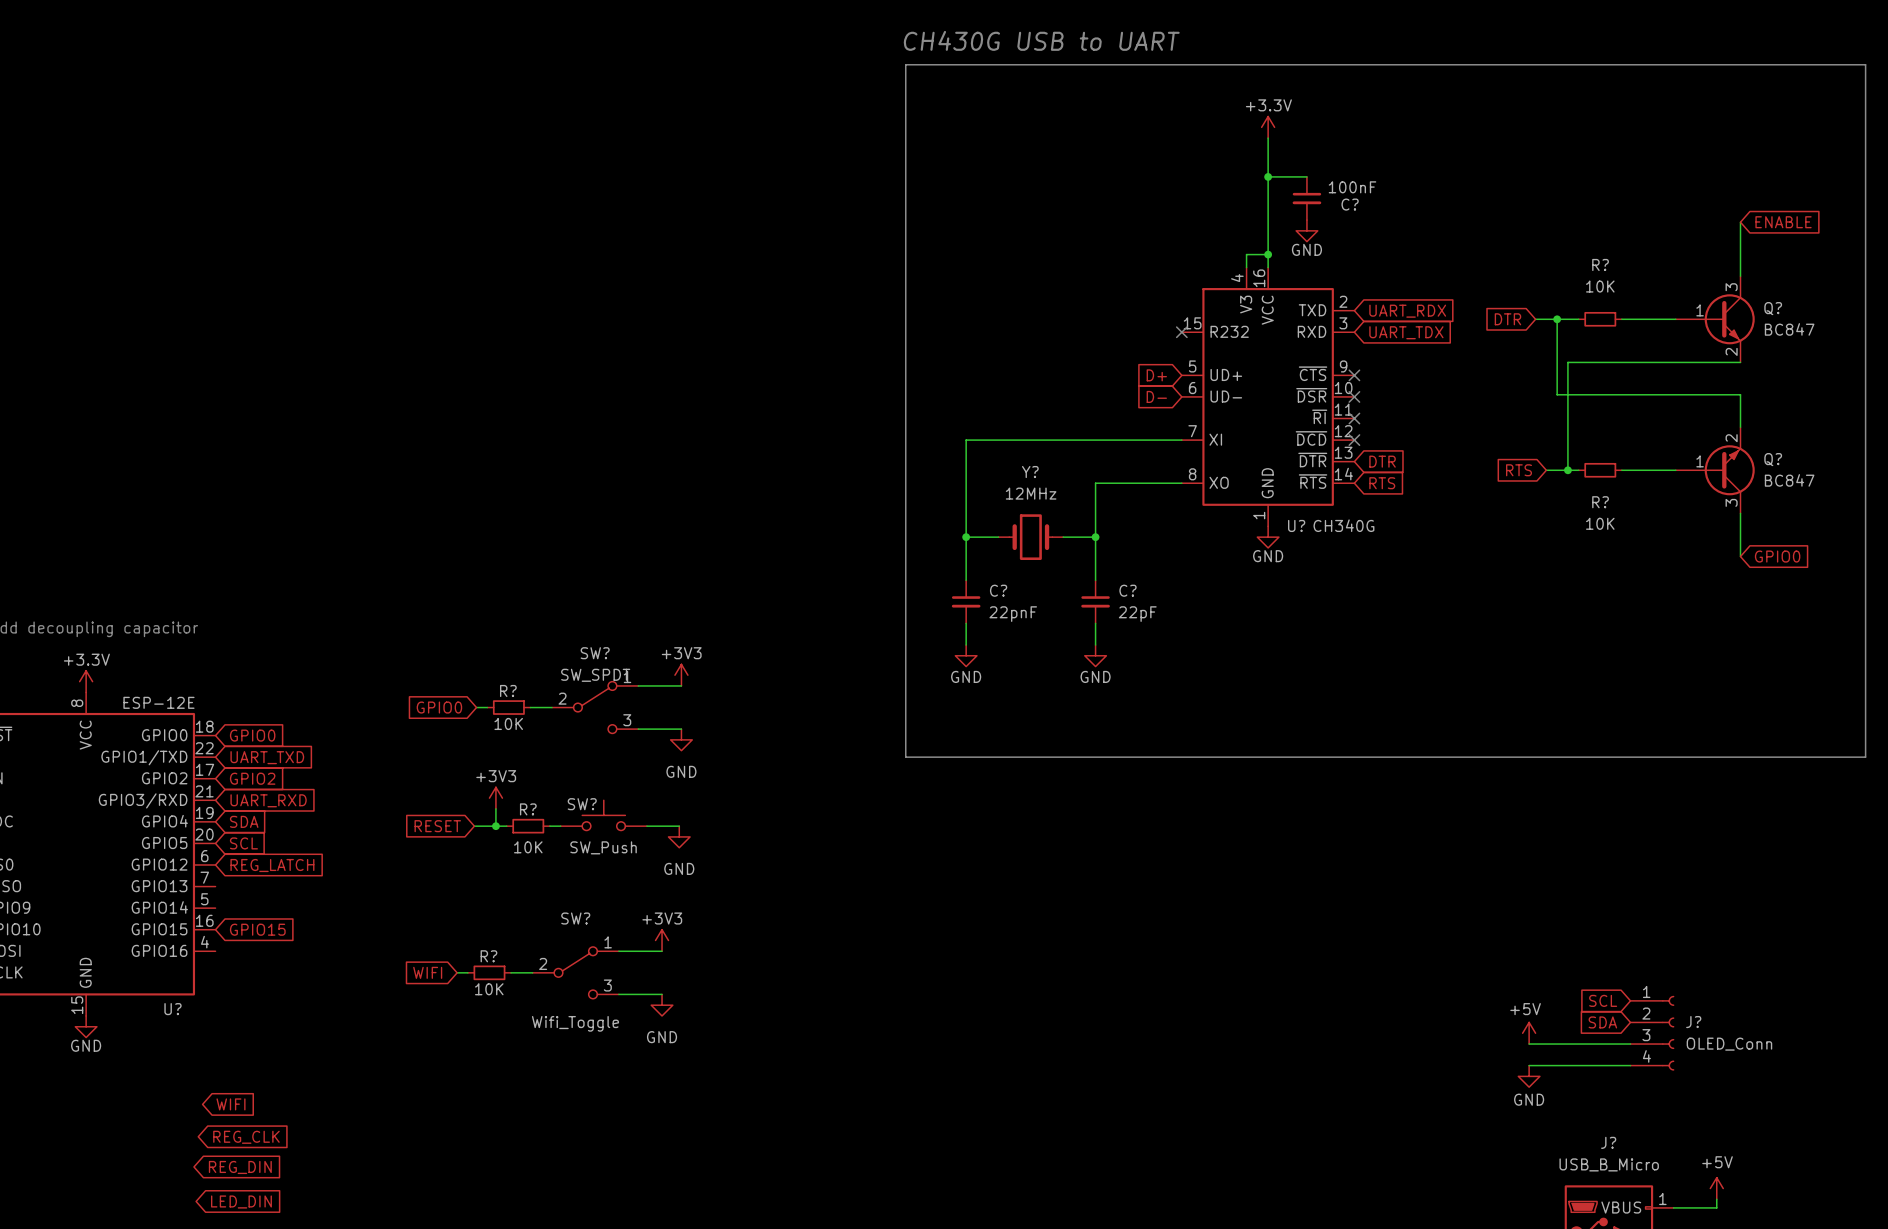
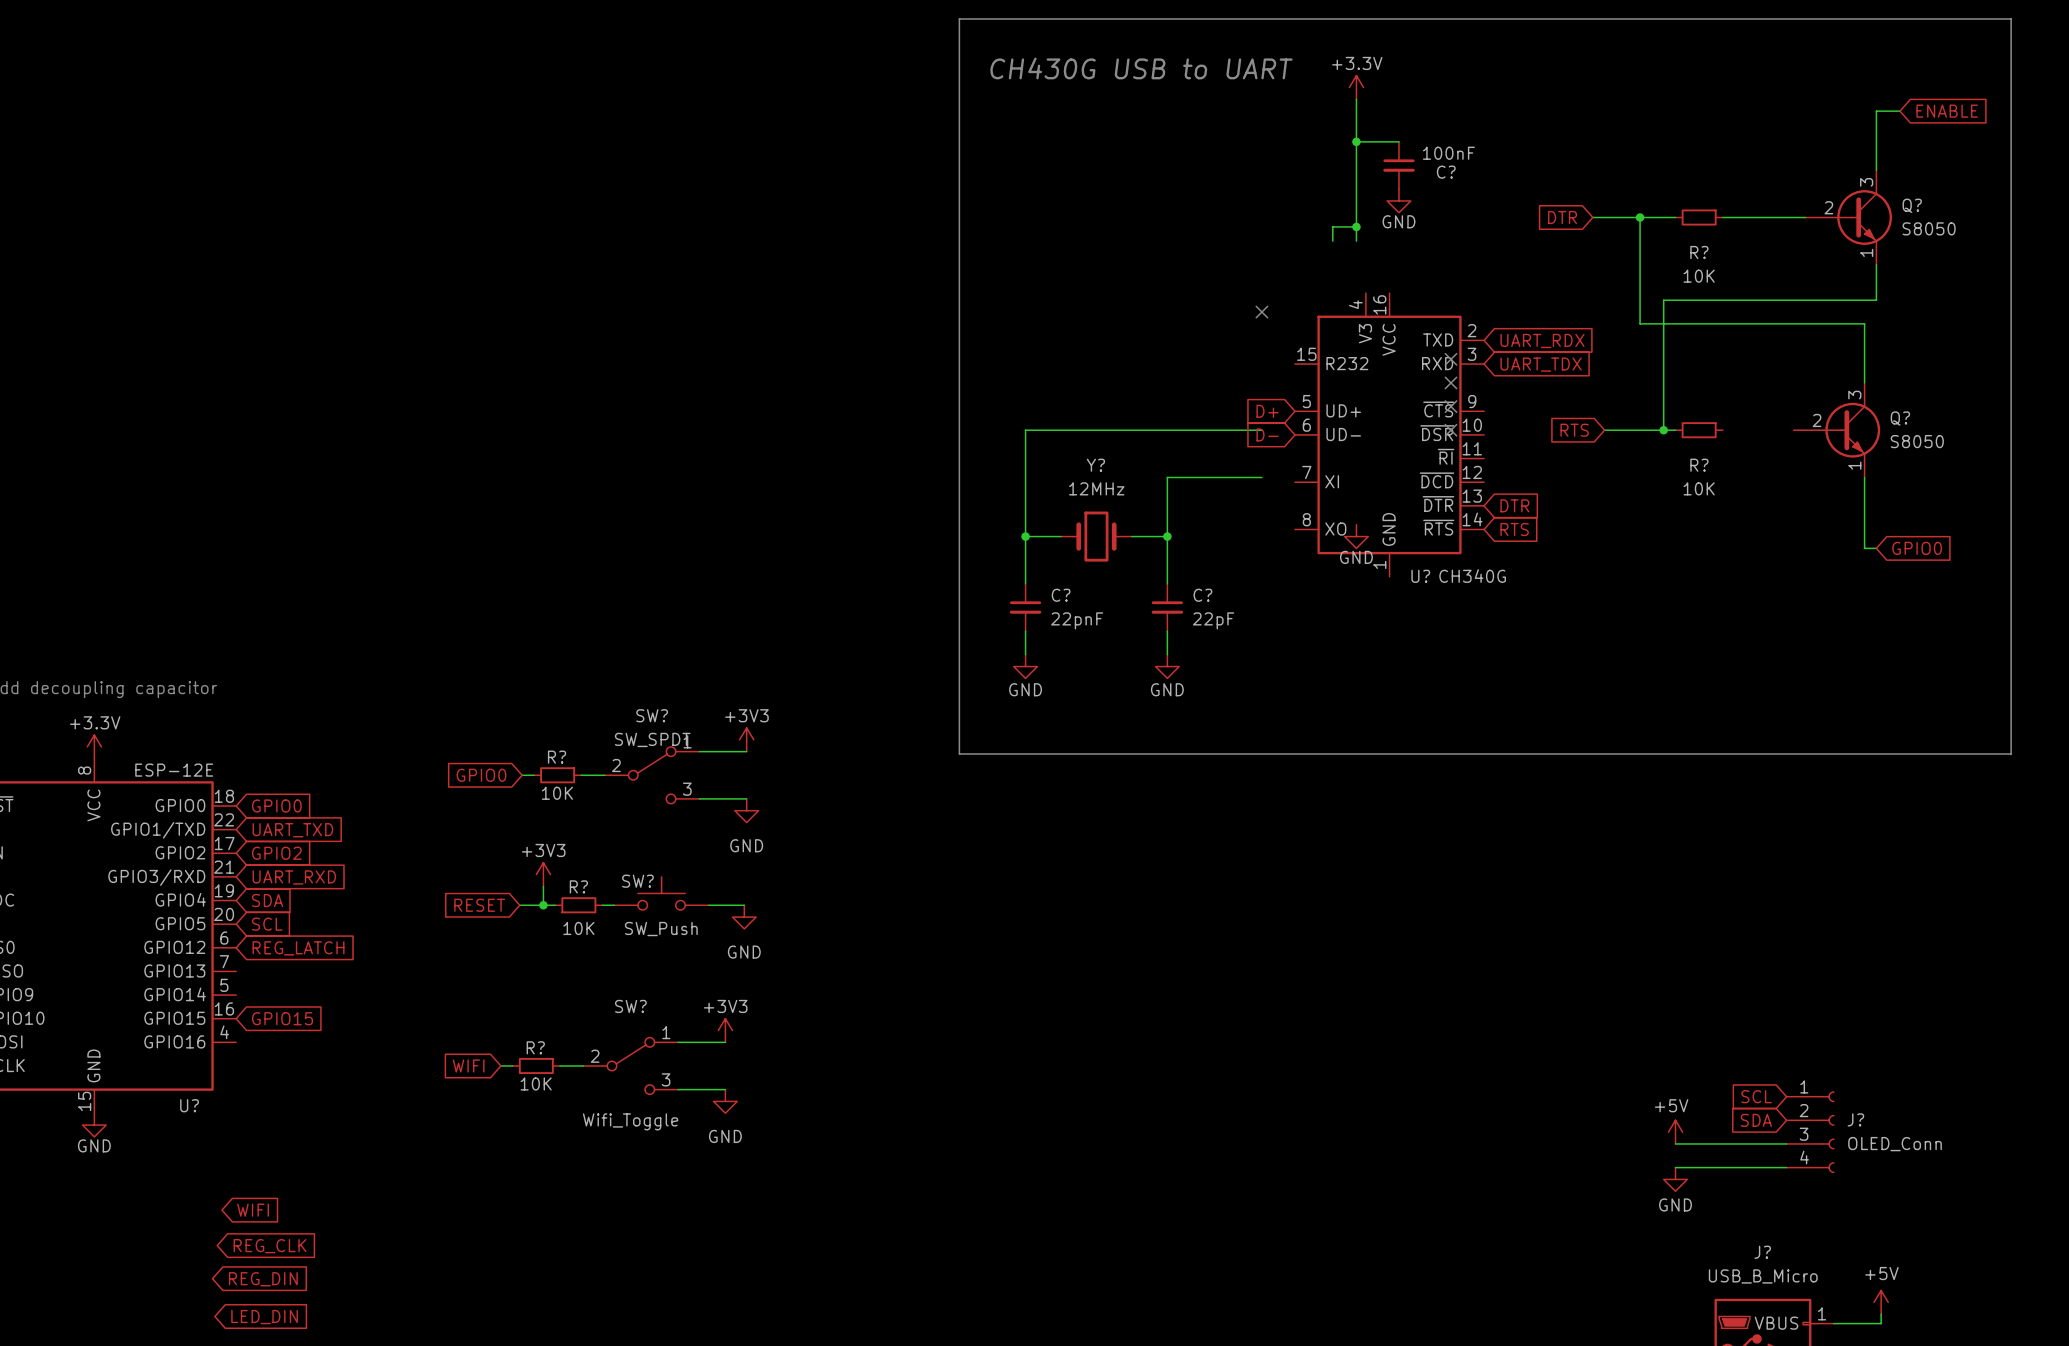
text position: CH430G USB to UART (1041, 40) -> CH430G USB to UART (1141, 68)
line: (905, 64) (905, 757) (1865, 757) (1865, 64) (905, 64) -> (959, 18) (959, 754) (2011, 754) (2011, 18) (959, 18)
wire: none -> (1900, 111) (1876, 111) (1876, 170)
power symbol position: +3.3V (1268, 127) -> +3.3V (1356, 87)
junction: none -> (1356, 141)
wire: (1268, 138) (1268, 267) -> (1356, 99) (1356, 241)
wire: (1268, 176) (1306, 176) -> (1356, 141) (1398, 141)
junction: (1268, 176) -> none
C? position: (1306, 198) -> (1398, 165)
wire: none -> (1592, 217) (1675, 217)
wire: none -> (1640, 217) (1640, 323) (1864, 323) (1864, 382)
junction: none -> (1640, 217)
R?: none -> 10K (1699, 217)
wire: none -> (1722, 217) (1805, 217)
Q?: none -> S8050 (1848, 217)
junction: none -> (1356, 226)
wire: (1740, 222) (1740, 276) -> none
global label position: ENABLE (1783, 222) -> ENABLE (1947, 111)
power symbol position: GND (1306, 230) -> GND (1398, 200)
wire: none -> (1876, 264) (1876, 300) (1663, 300) (1663, 430)
wire: (1268, 254) (1246, 254) (1246, 267) -> (1356, 226) (1332, 226) (1332, 241)
junction: (1268, 254) -> none
no-connect mark: none -> (1261, 312)
global label position: DTR (1507, 319) -> DTR (1562, 217)
wire: (1535, 319) (1578, 319) -> none
wire: (1557, 319) (1557, 394) (1740, 394) (1740, 427) -> none
junction: (1557, 319) -> none
R?: 10K (1600, 319) -> none
wire: (1621, 319) (1675, 319) -> none
Q?: BC847 (1715, 319) -> none
no-connect mark: none -> (1450, 359)
no-connect mark: (1181, 332) -> none
no-connect mark: none -> (1450, 382)
wire: (1740, 362) (1567, 362) (1567, 470) -> none
no-connect mark: none -> (1450, 406)
no-connect mark: (1354, 375) -> none
no-connect mark: none -> (1450, 430)
wire: none -> (1604, 430) (1675, 430)
junction: none -> (1663, 430)
R?: none -> 10K (1699, 430)
Q?: none -> S8050 (1836, 430)
no-connect mark: (1354, 396) -> none
no-connect mark: (1354, 418) -> none
wire: none -> (1864, 477) (1864, 548) (1876, 548)
wire: (1181, 440) (966, 440) (966, 580) -> (1261, 430) (1025, 430) (1025, 583)
no-connect mark: (1354, 440) -> none
global label position: RTS (1519, 470) -> RTS (1574, 430)
wire: (1546, 470) (1578, 470) -> none
junction: (1567, 470) -> none
R?: 10K (1600, 470) -> none
wire: (1621, 470) (1675, 470) -> none
Q?: BC847 (1715, 470) -> none
wire: (1181, 483) (1095, 483) (1095, 580) -> (1261, 477) (1167, 477) (1167, 583)
junction: none -> (1025, 536)
junction: none -> (1167, 536)
wire: (1740, 513) (1740, 556) -> none
wire: (966, 537) (998, 537) -> (1025, 536) (1061, 536)
junction: (966, 537) -> none
Y? position: (1030, 537) -> (1096, 536)
wire: (1063, 537) (1095, 537) -> (1131, 536) (1167, 536)
junction: (1095, 537) -> none
power symbol position: GND (1268, 537) -> GND (1356, 536)
global label position: GPIO0 (1777, 556) -> GPIO0 (1917, 548)
C? position: (966, 601) -> (1025, 607)
C? position: (1095, 601) -> (1167, 607)
power symbol: none -> GND (1025, 666)
power symbol: none -> GND (1167, 666)
wire: (966, 623) (966, 644) -> (1025, 631) (1025, 654)
wire: (1095, 623) (1095, 644) -> (1167, 631) (1167, 654)
power symbol: GND (966, 655) -> none
power symbol: GND (1095, 655) -> none

